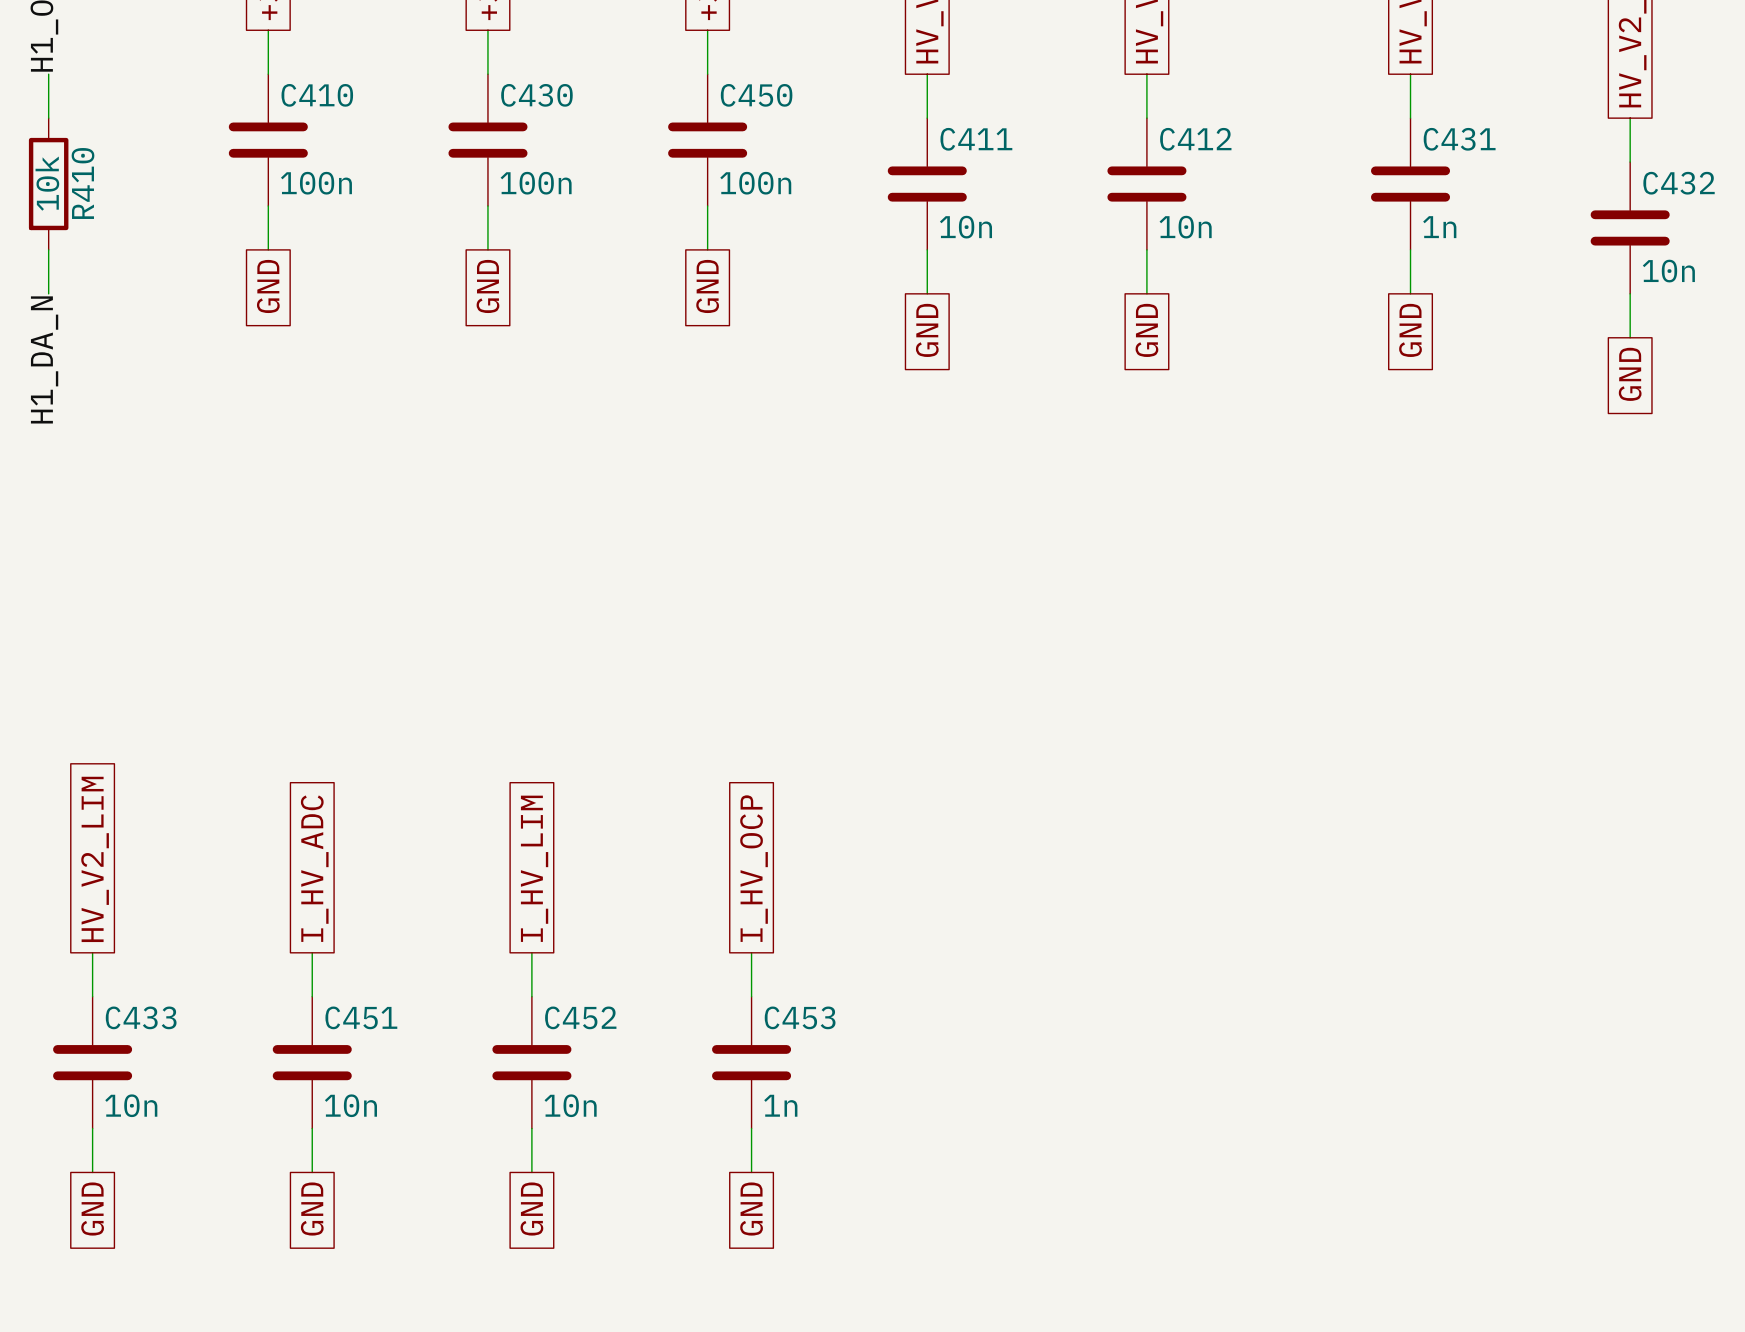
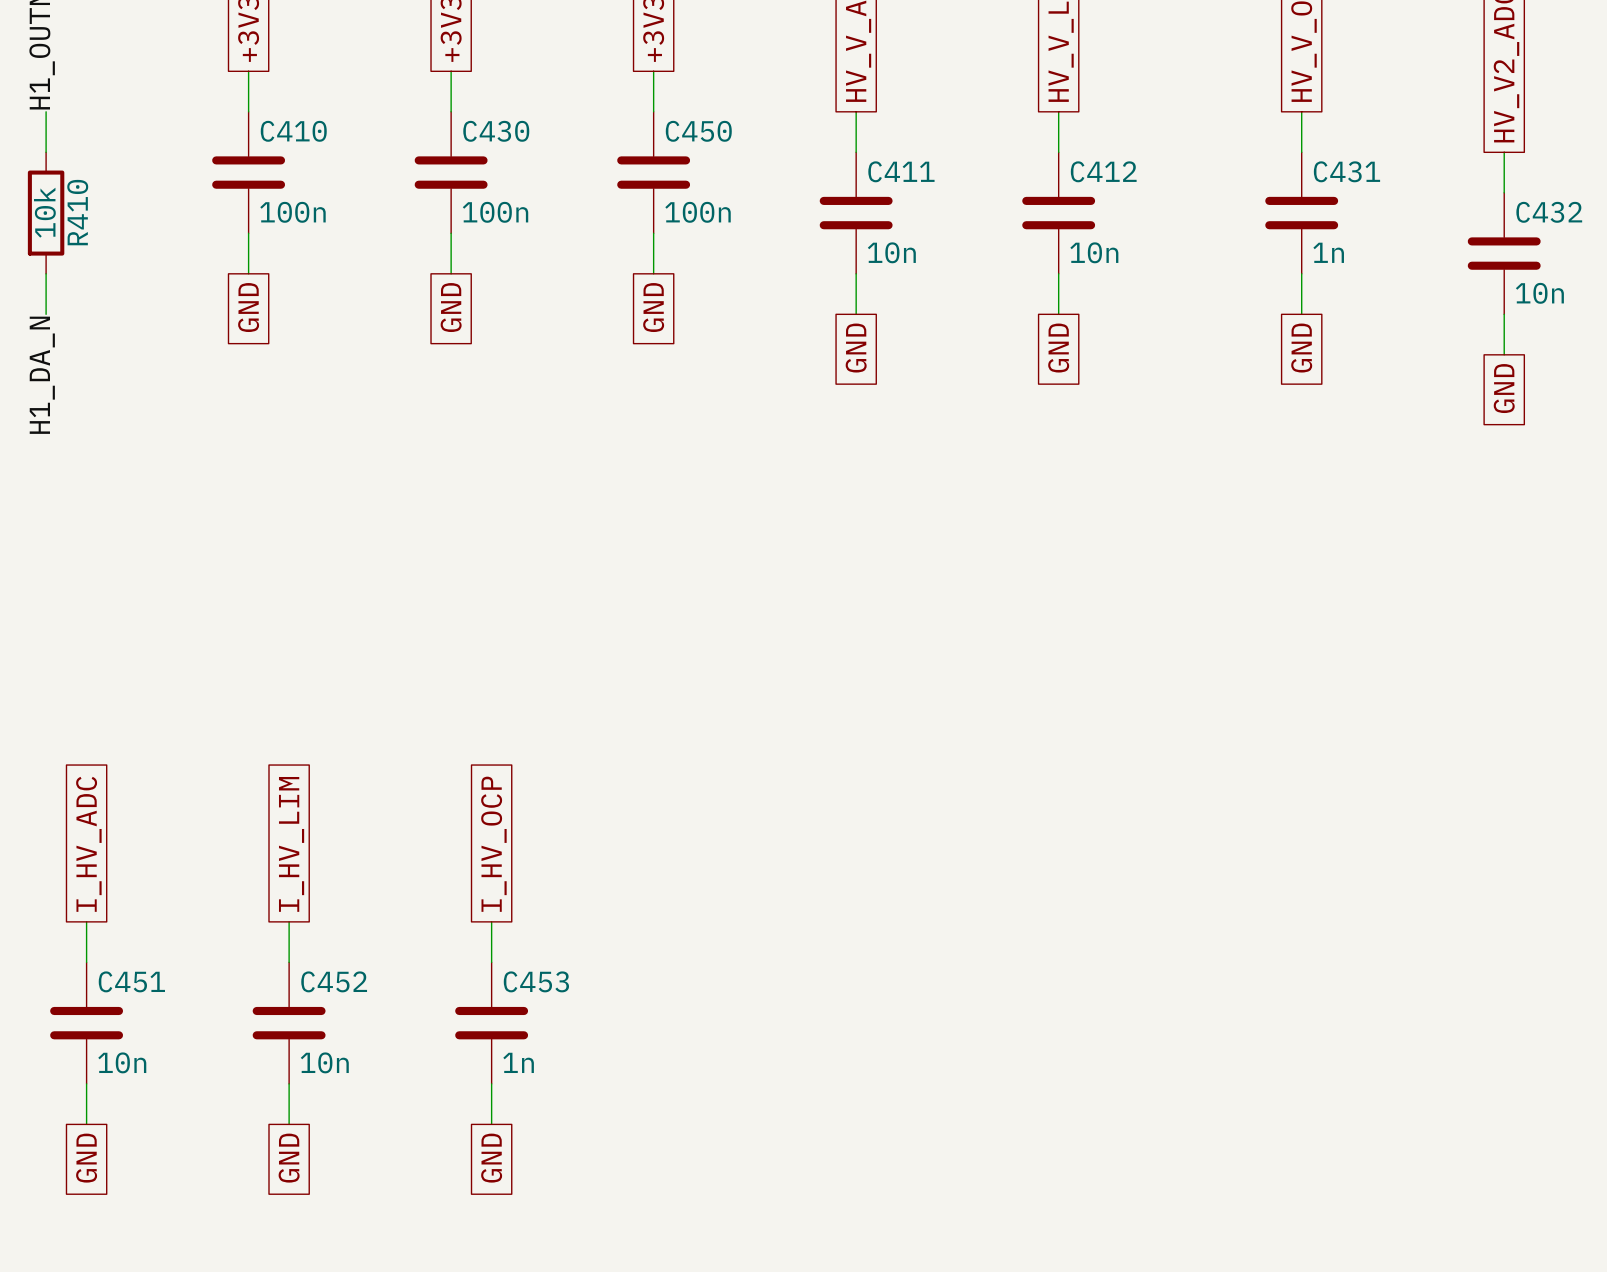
global label: HV_V2_LIM (95, 859) -> I_HV_ADC (88, 844)
global label: I_HV_ADC (314, 868) -> I_HV_LIM (291, 844)
global label: I_HV_LIM (534, 868) -> I_HV_OCP (493, 844)
global label: I_HV_OCP (754, 868) -> none
wire: (751, 952) (751, 996) -> none
C433 name: C433 (141, 1017) -> C451 (131, 981)
C451 name: C451 (361, 1017) -> C452 (334, 981)
C452 name: C452 (580, 1017) -> C453 (536, 981)
C453: 1n (751, 1062) -> none
C452 value: 10n (570, 1105) -> 1n (518, 1062)
wire: (751, 1128) (751, 1172) -> none
global label: GND (751, 1209) -> none

